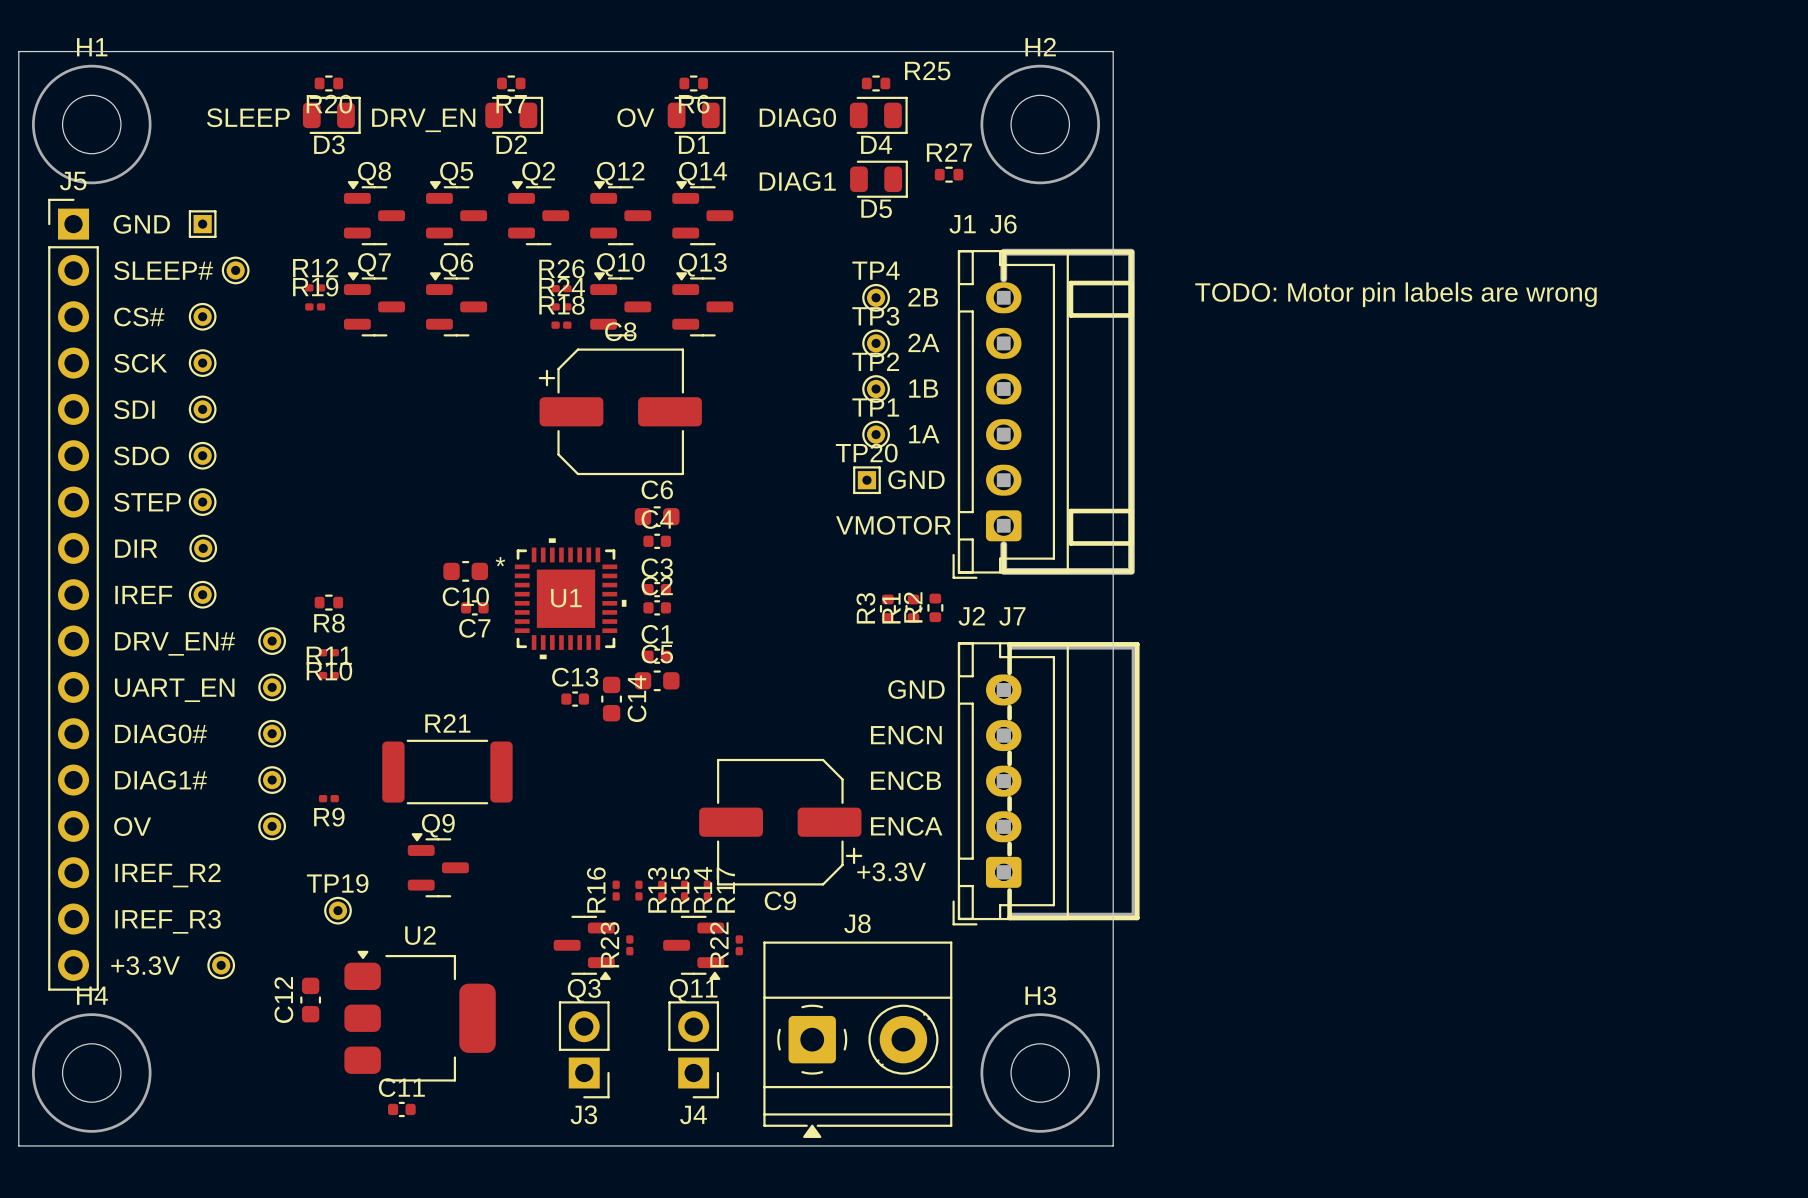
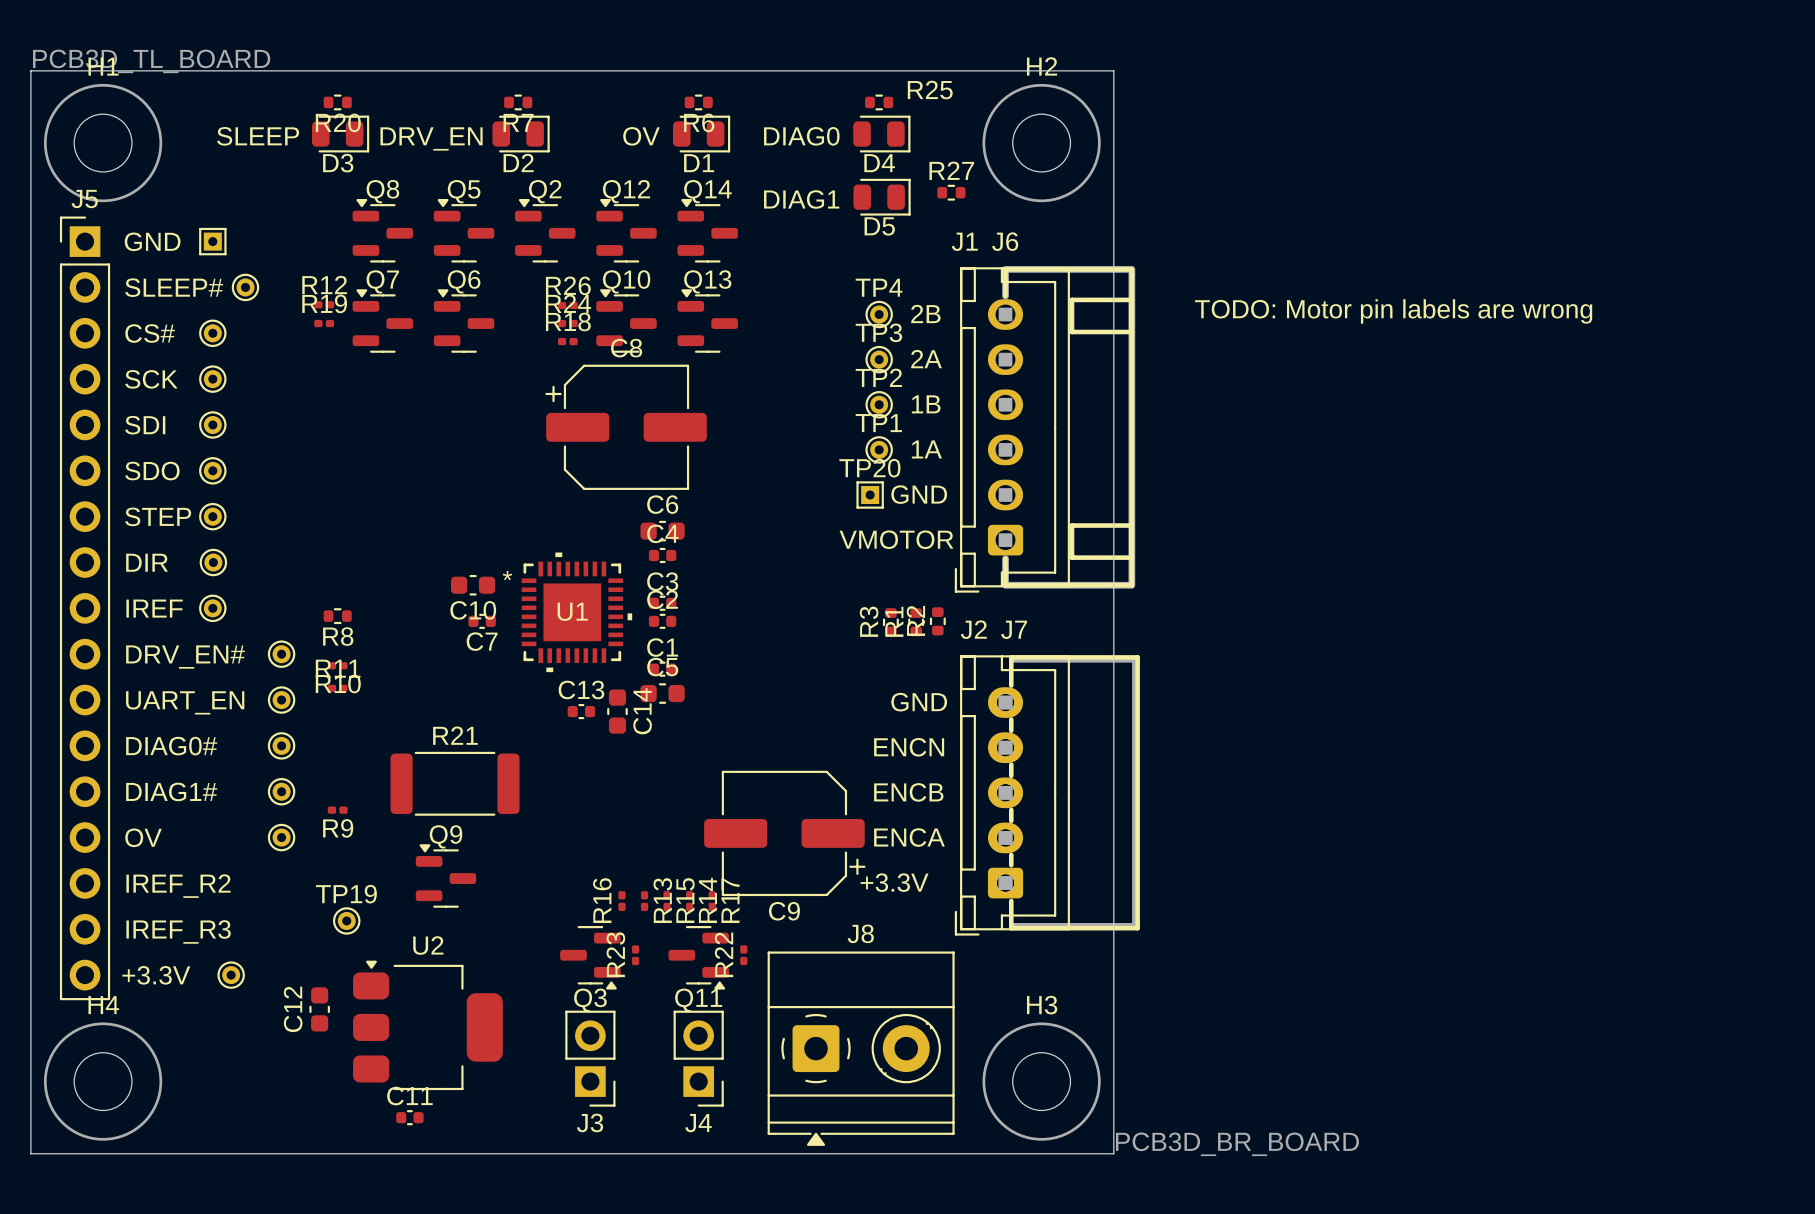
text: none -> PCB3D_TL_BOARD (151, 61)
text: none -> PCB3D_BR_BOARD (1237, 1144)

